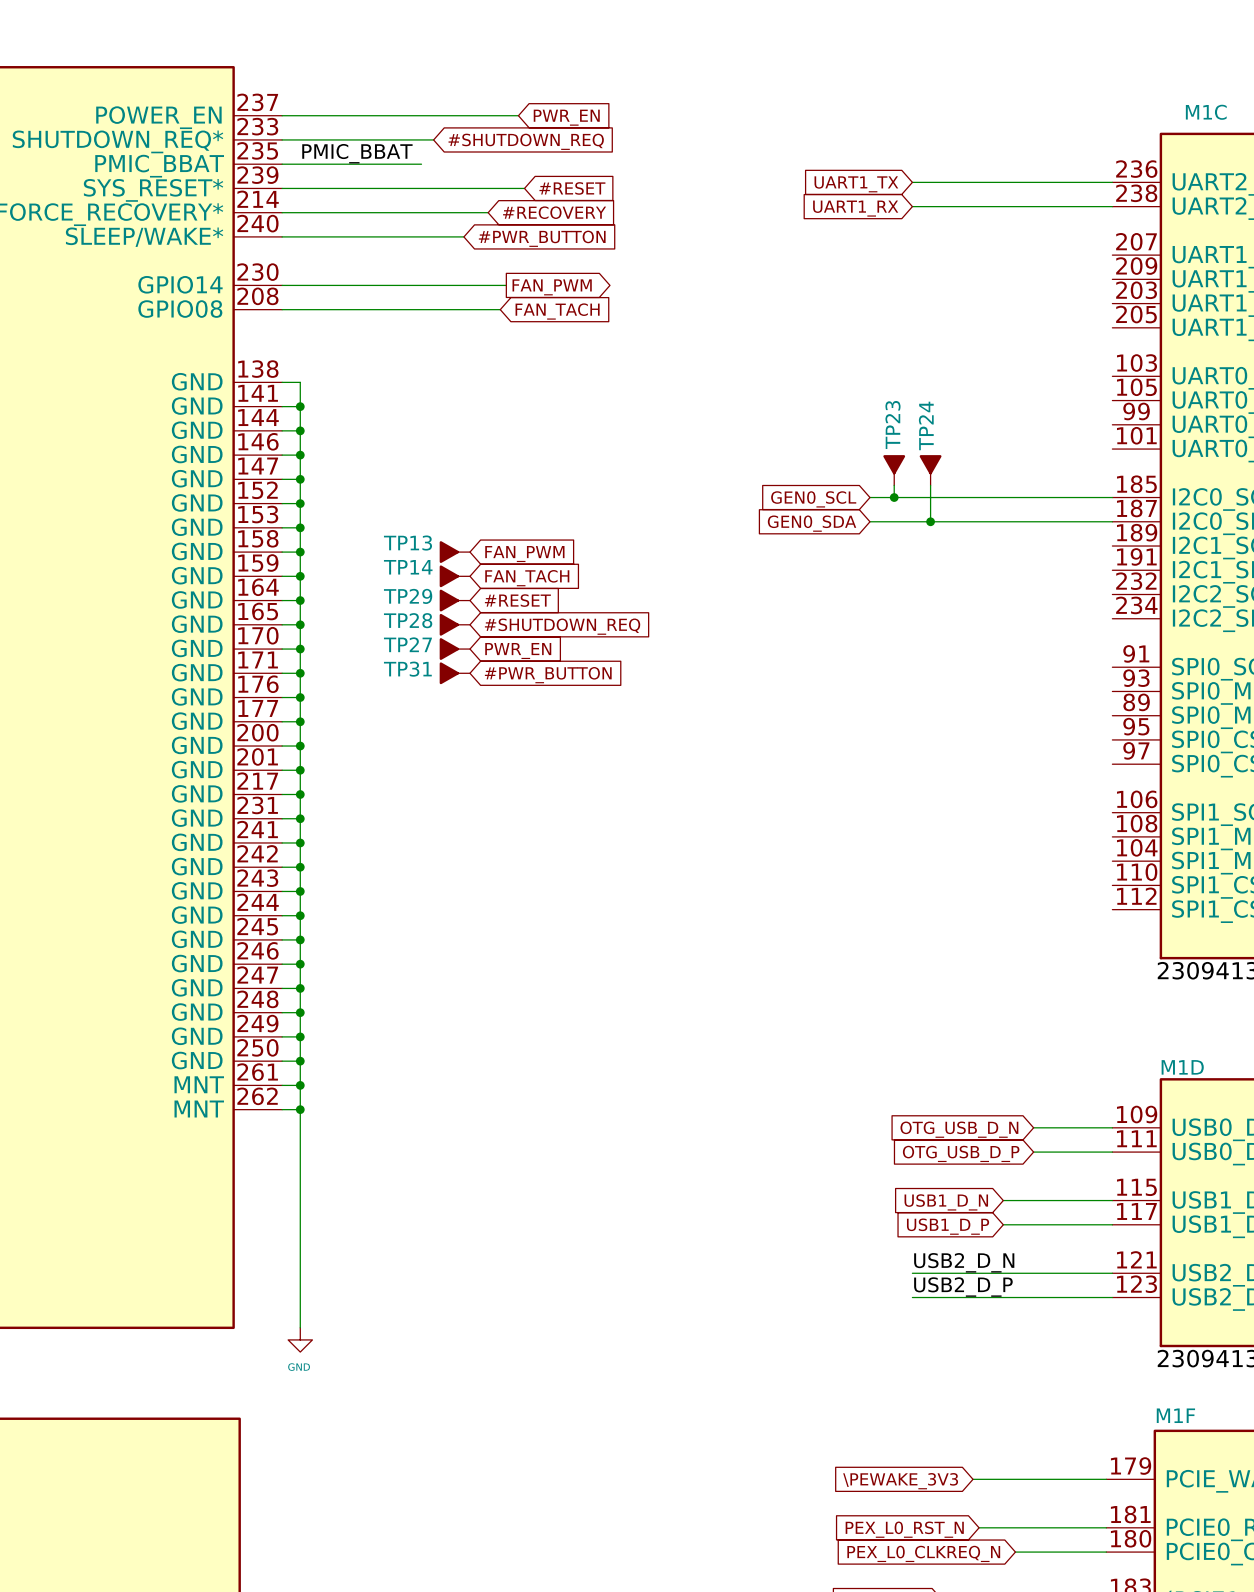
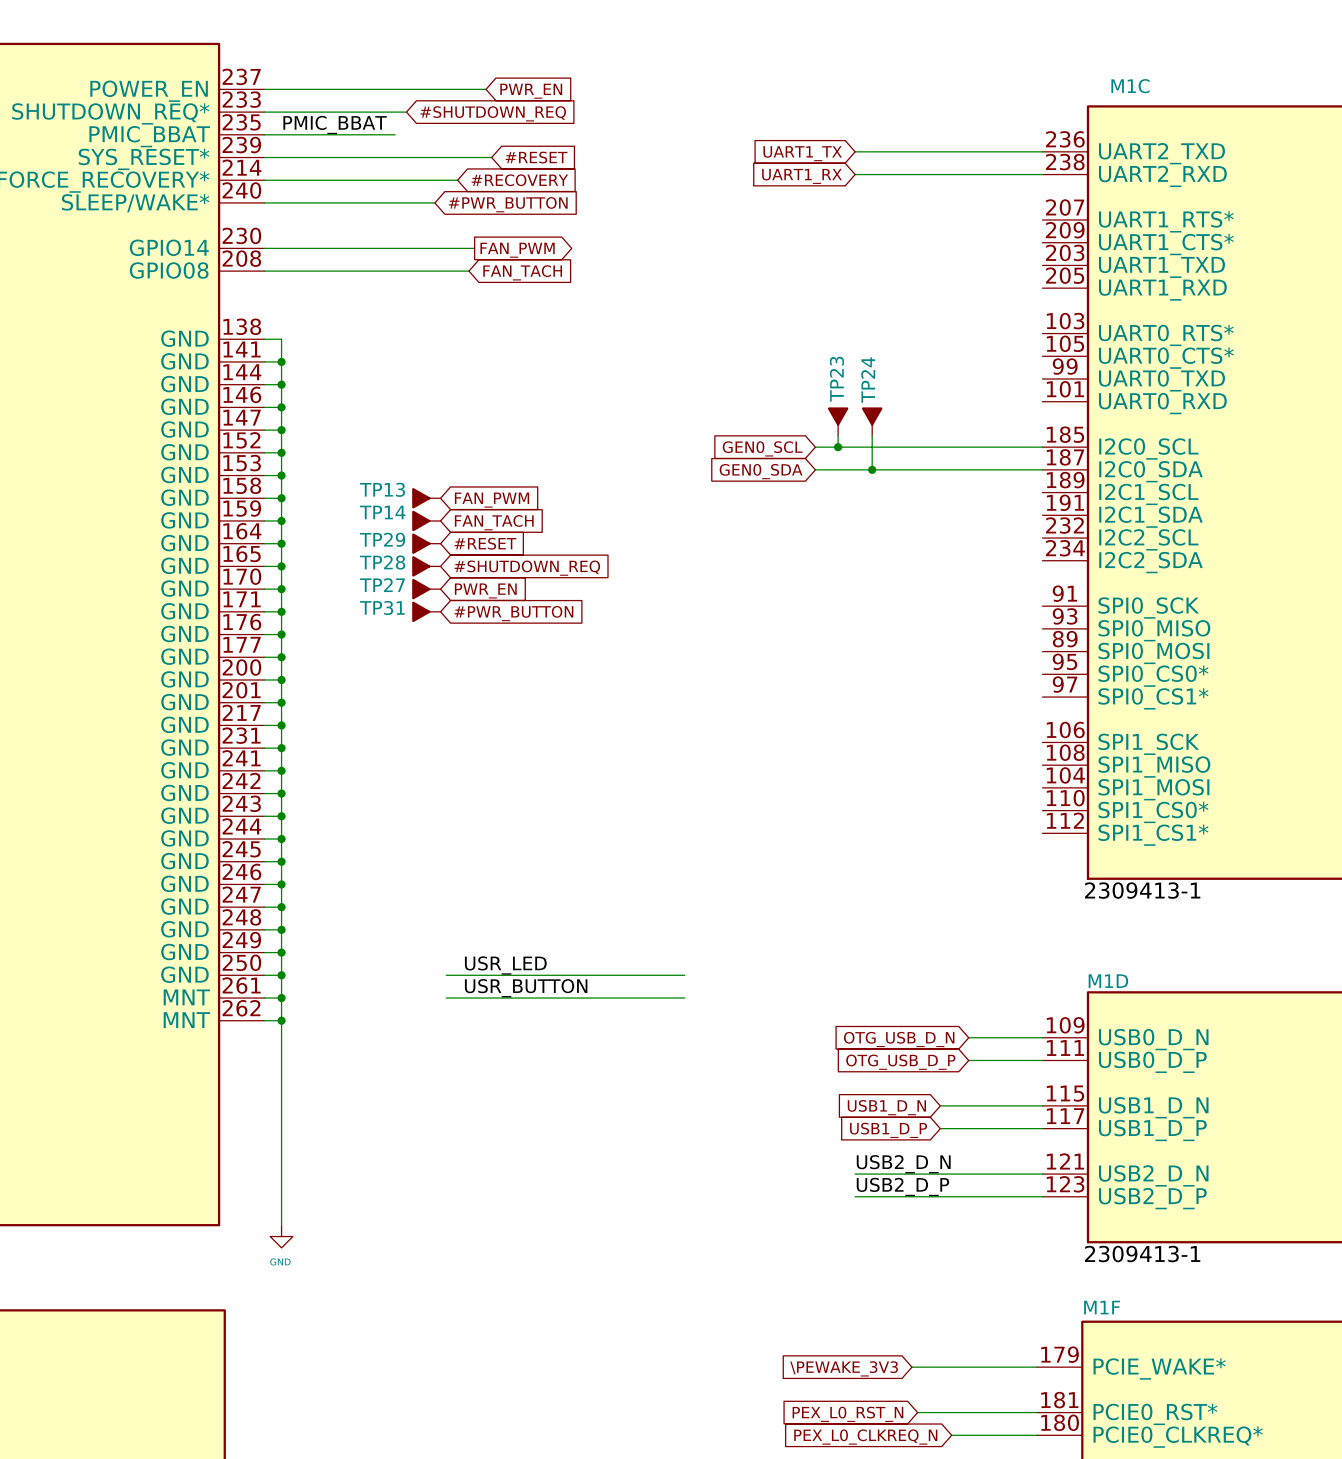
label: none -> USR_LED (505, 965)
wire: none -> (446, 975) (684, 975)
label: none -> USR_BUTTON (526, 988)
wire: none -> (446, 998) (684, 998)

